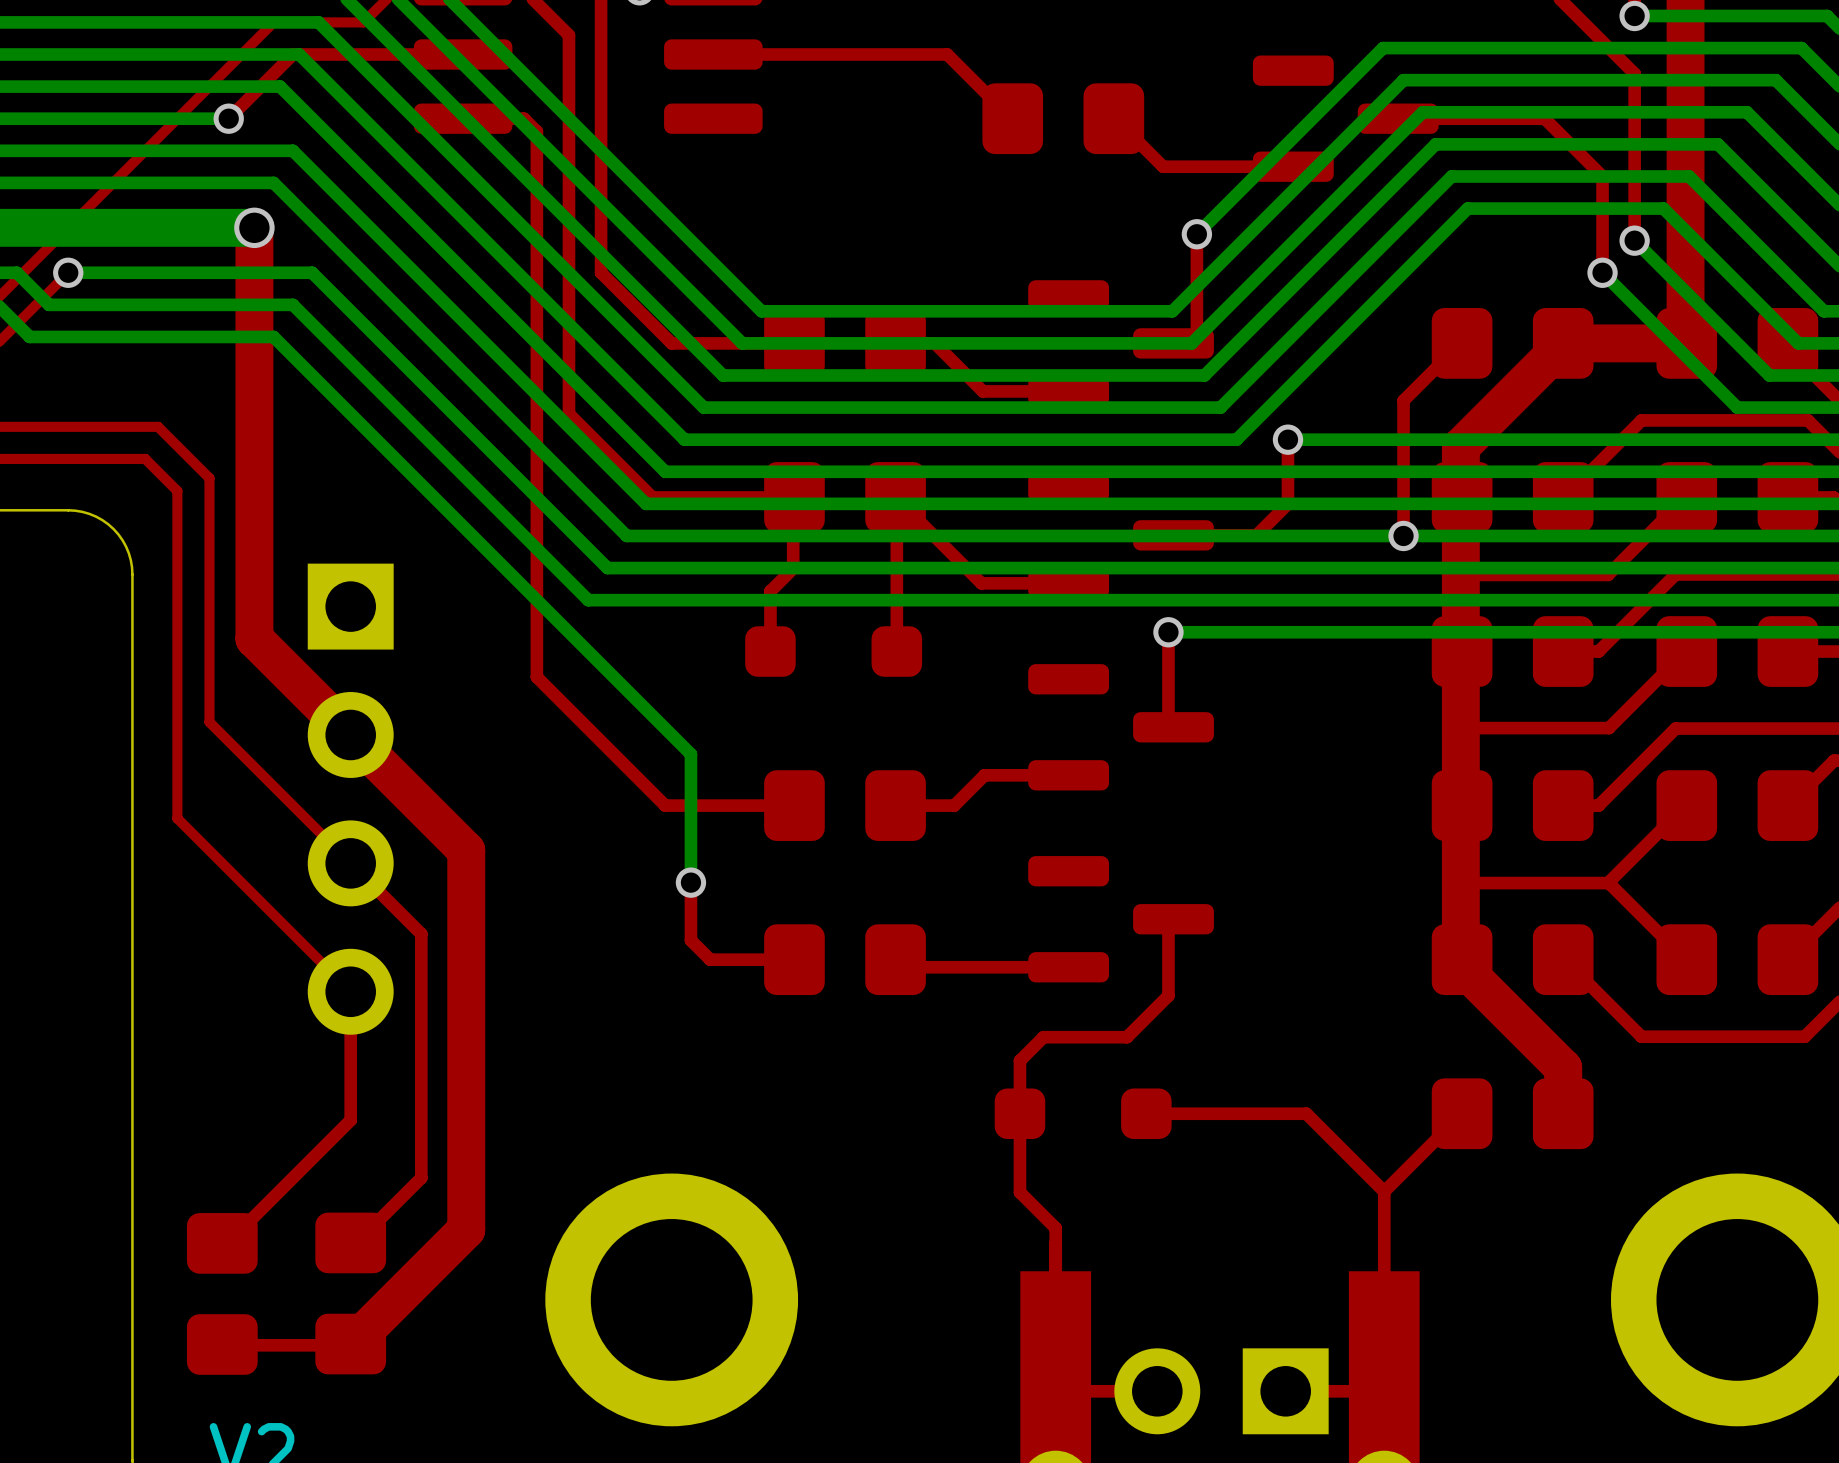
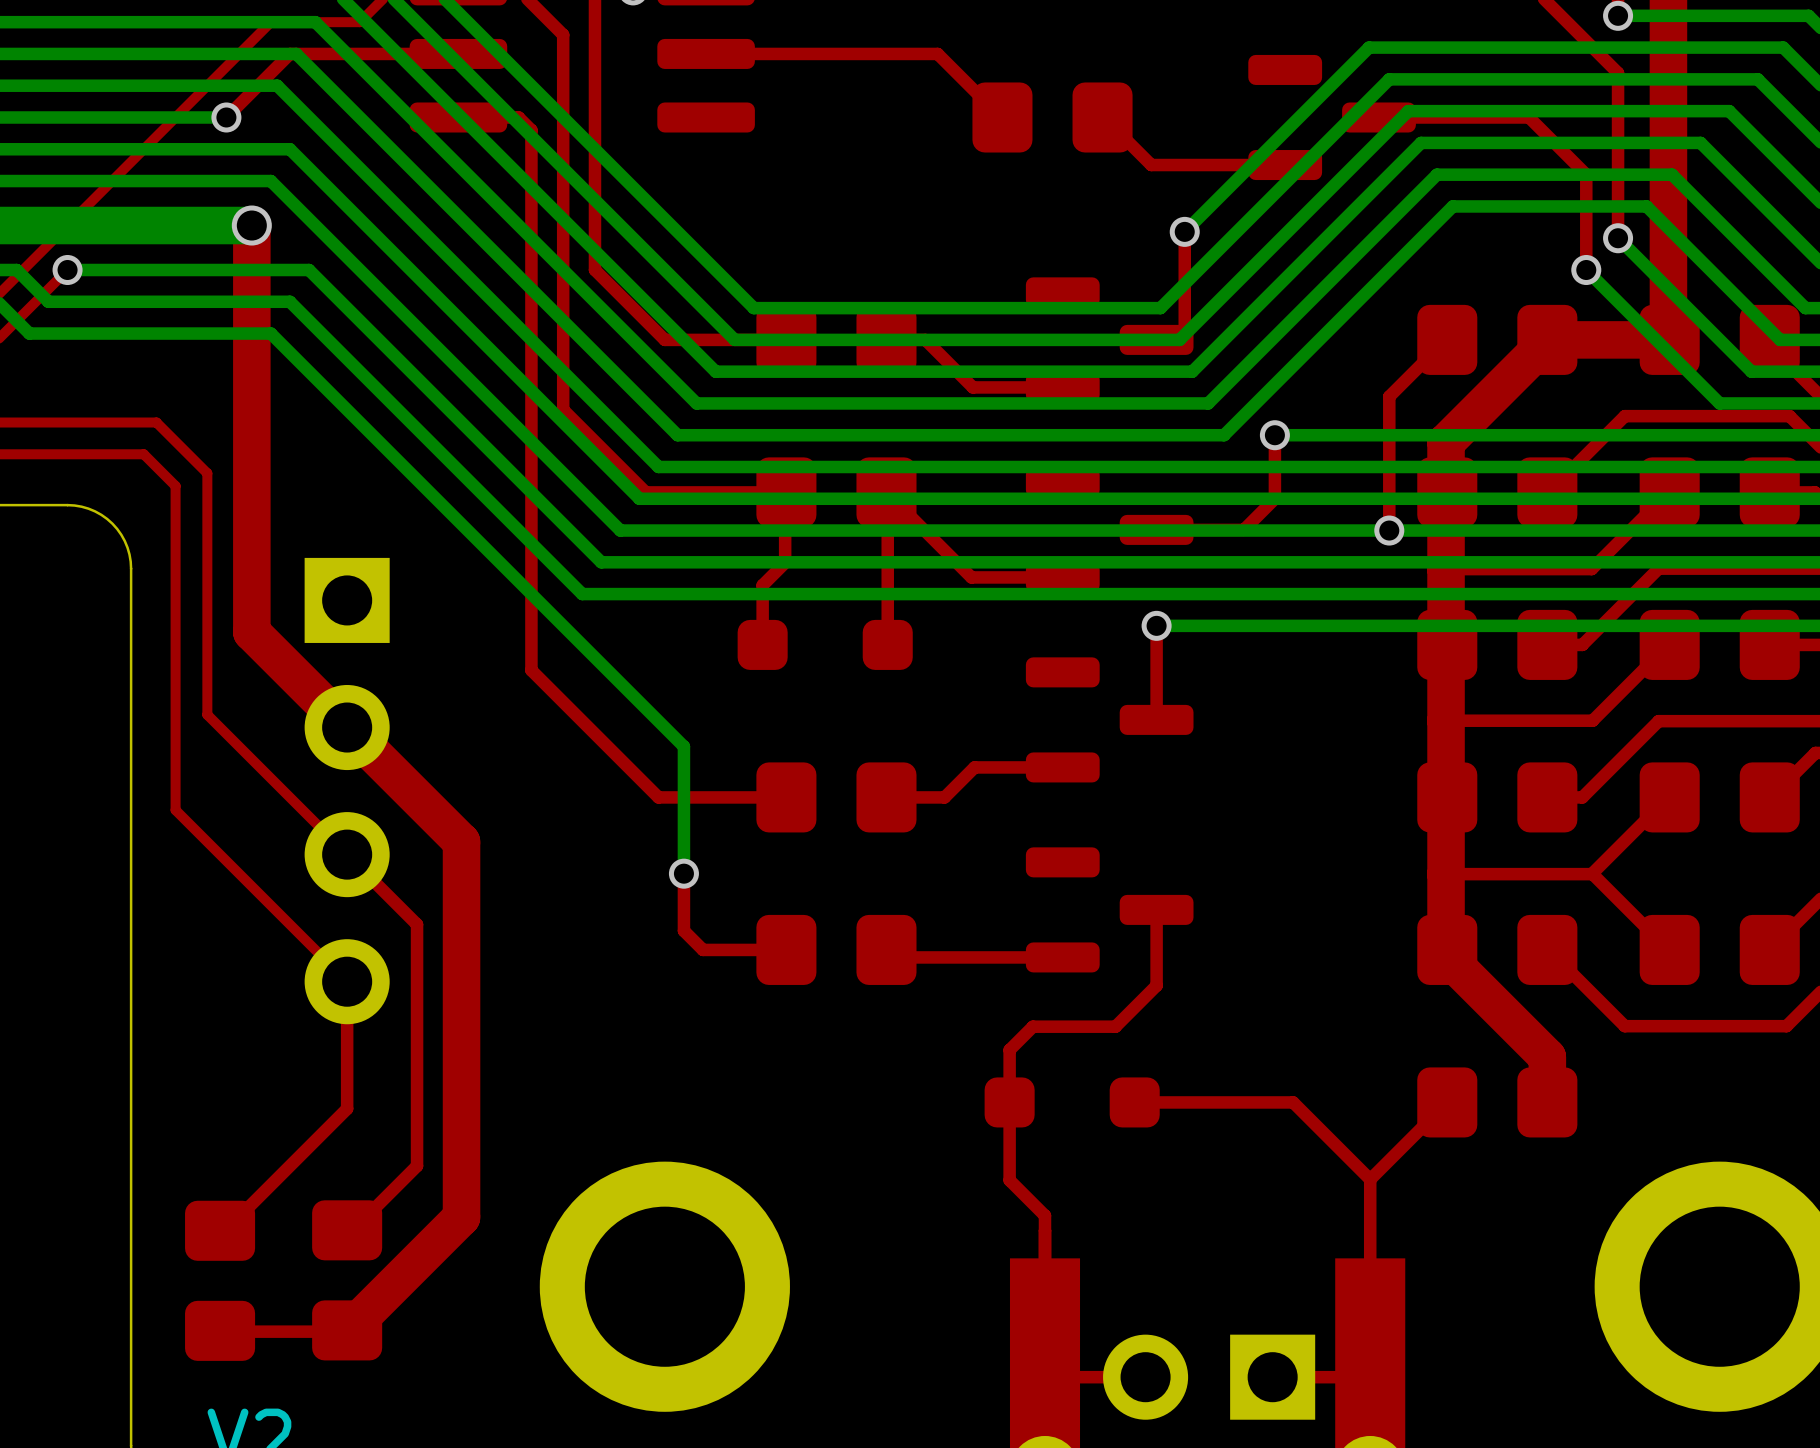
part footprint: [1252, 55, 1439, 182] -> [1248, 54, 1416, 181]
part footprint: [1028, 280, 1214, 407] -> [1025, 277, 1194, 403]
part footprint: [1028, 472, 1214, 599] -> [1025, 467, 1194, 593]
part footprint: [1028, 664, 1214, 791] -> [1025, 657, 1194, 783]
part footprint: [1028, 856, 1214, 983] -> [1025, 847, 1194, 973]

